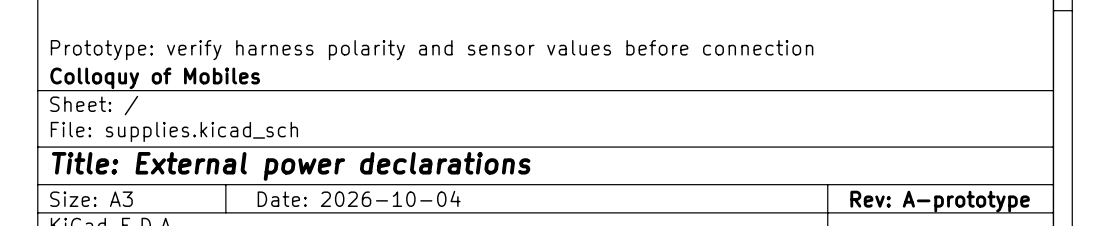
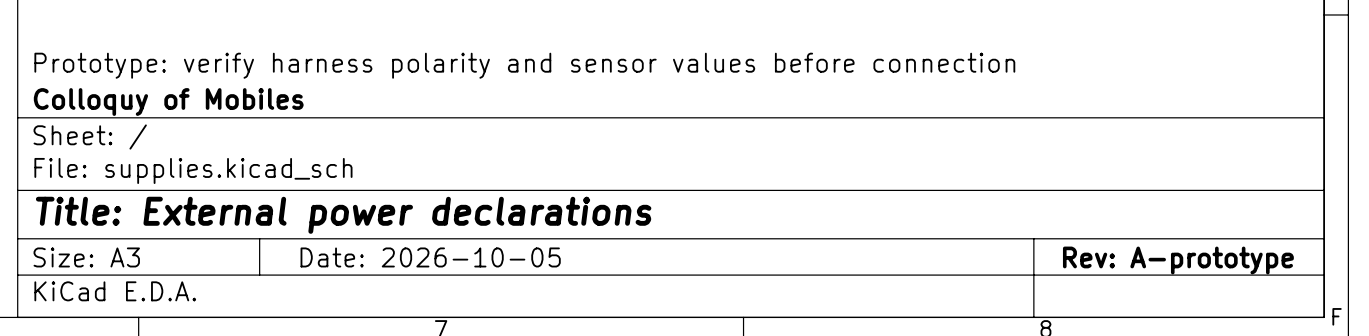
title block: Date: 2026-10-04 (359, 198) -> Date: 2026-10-05 (430, 257)

